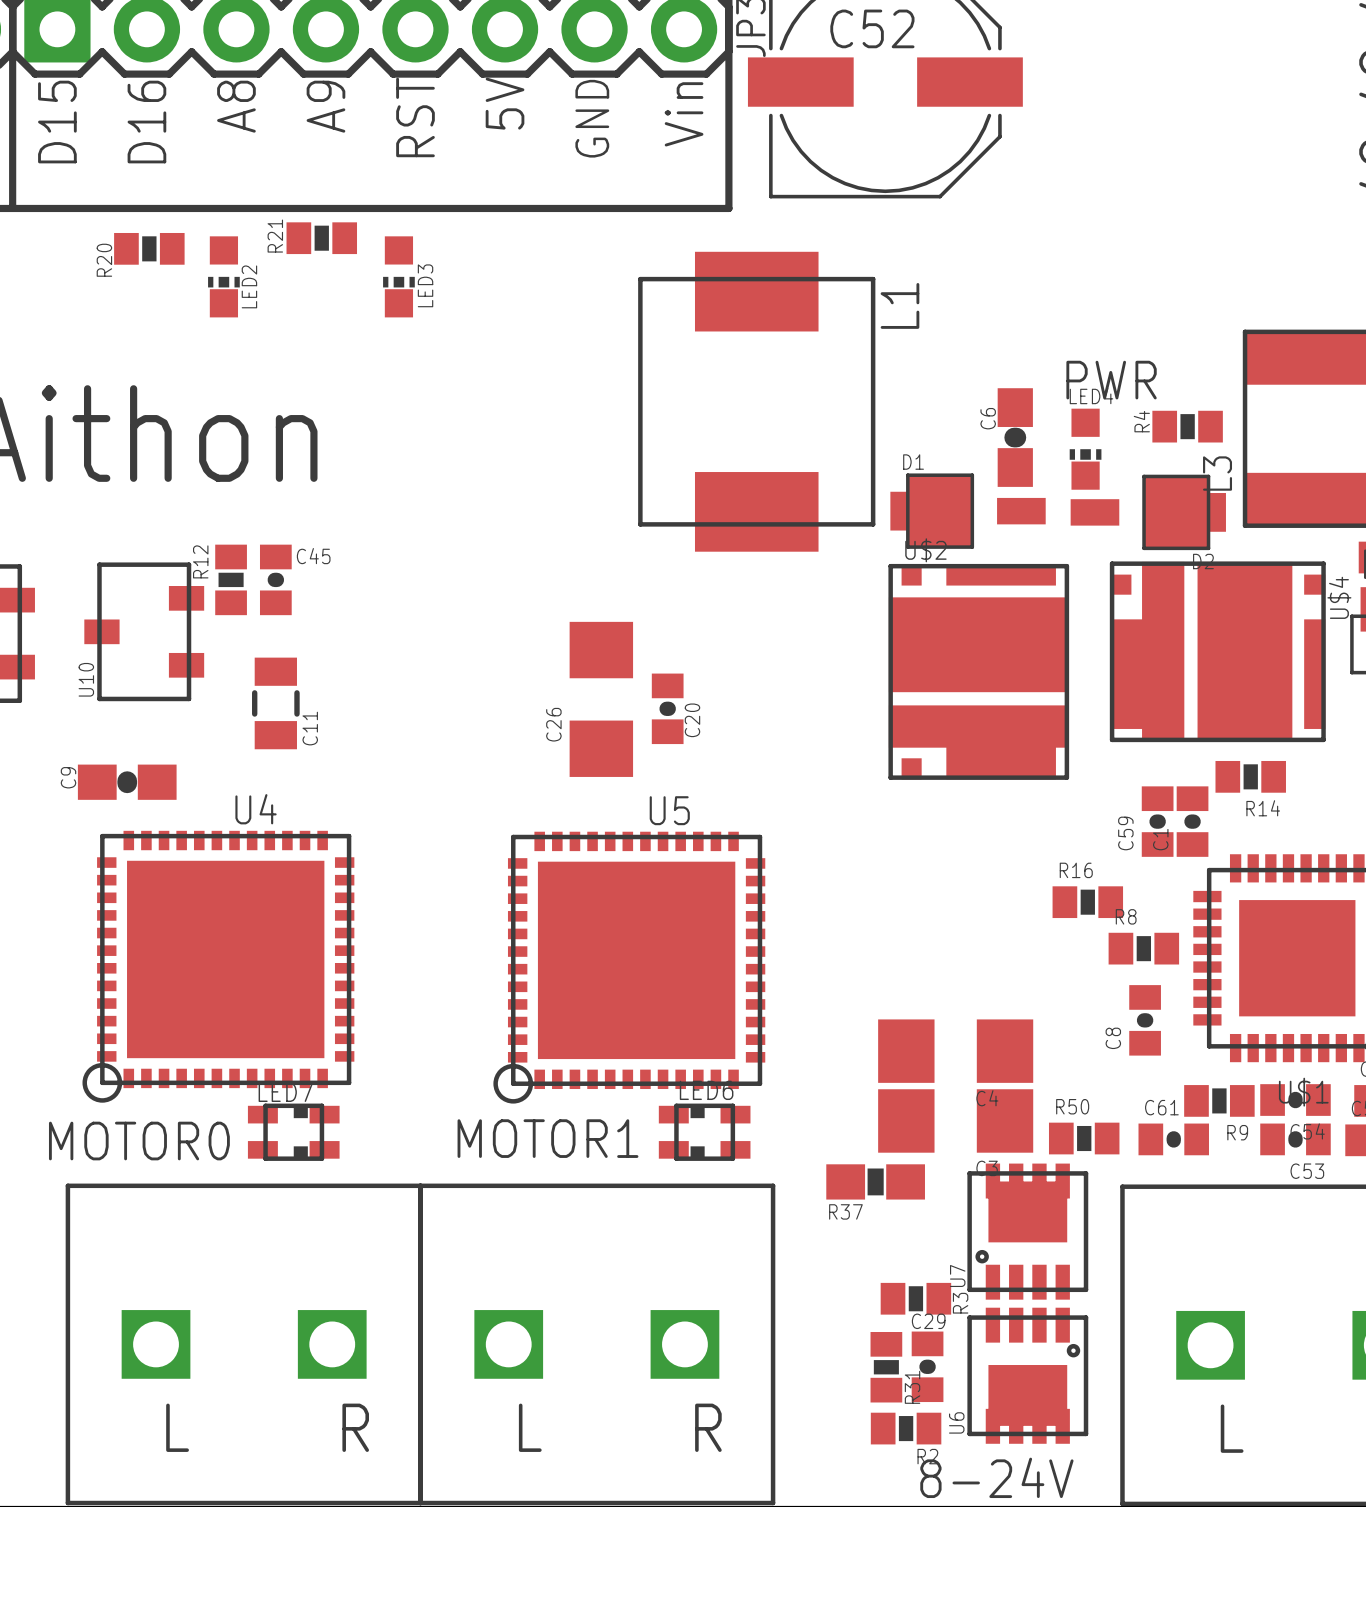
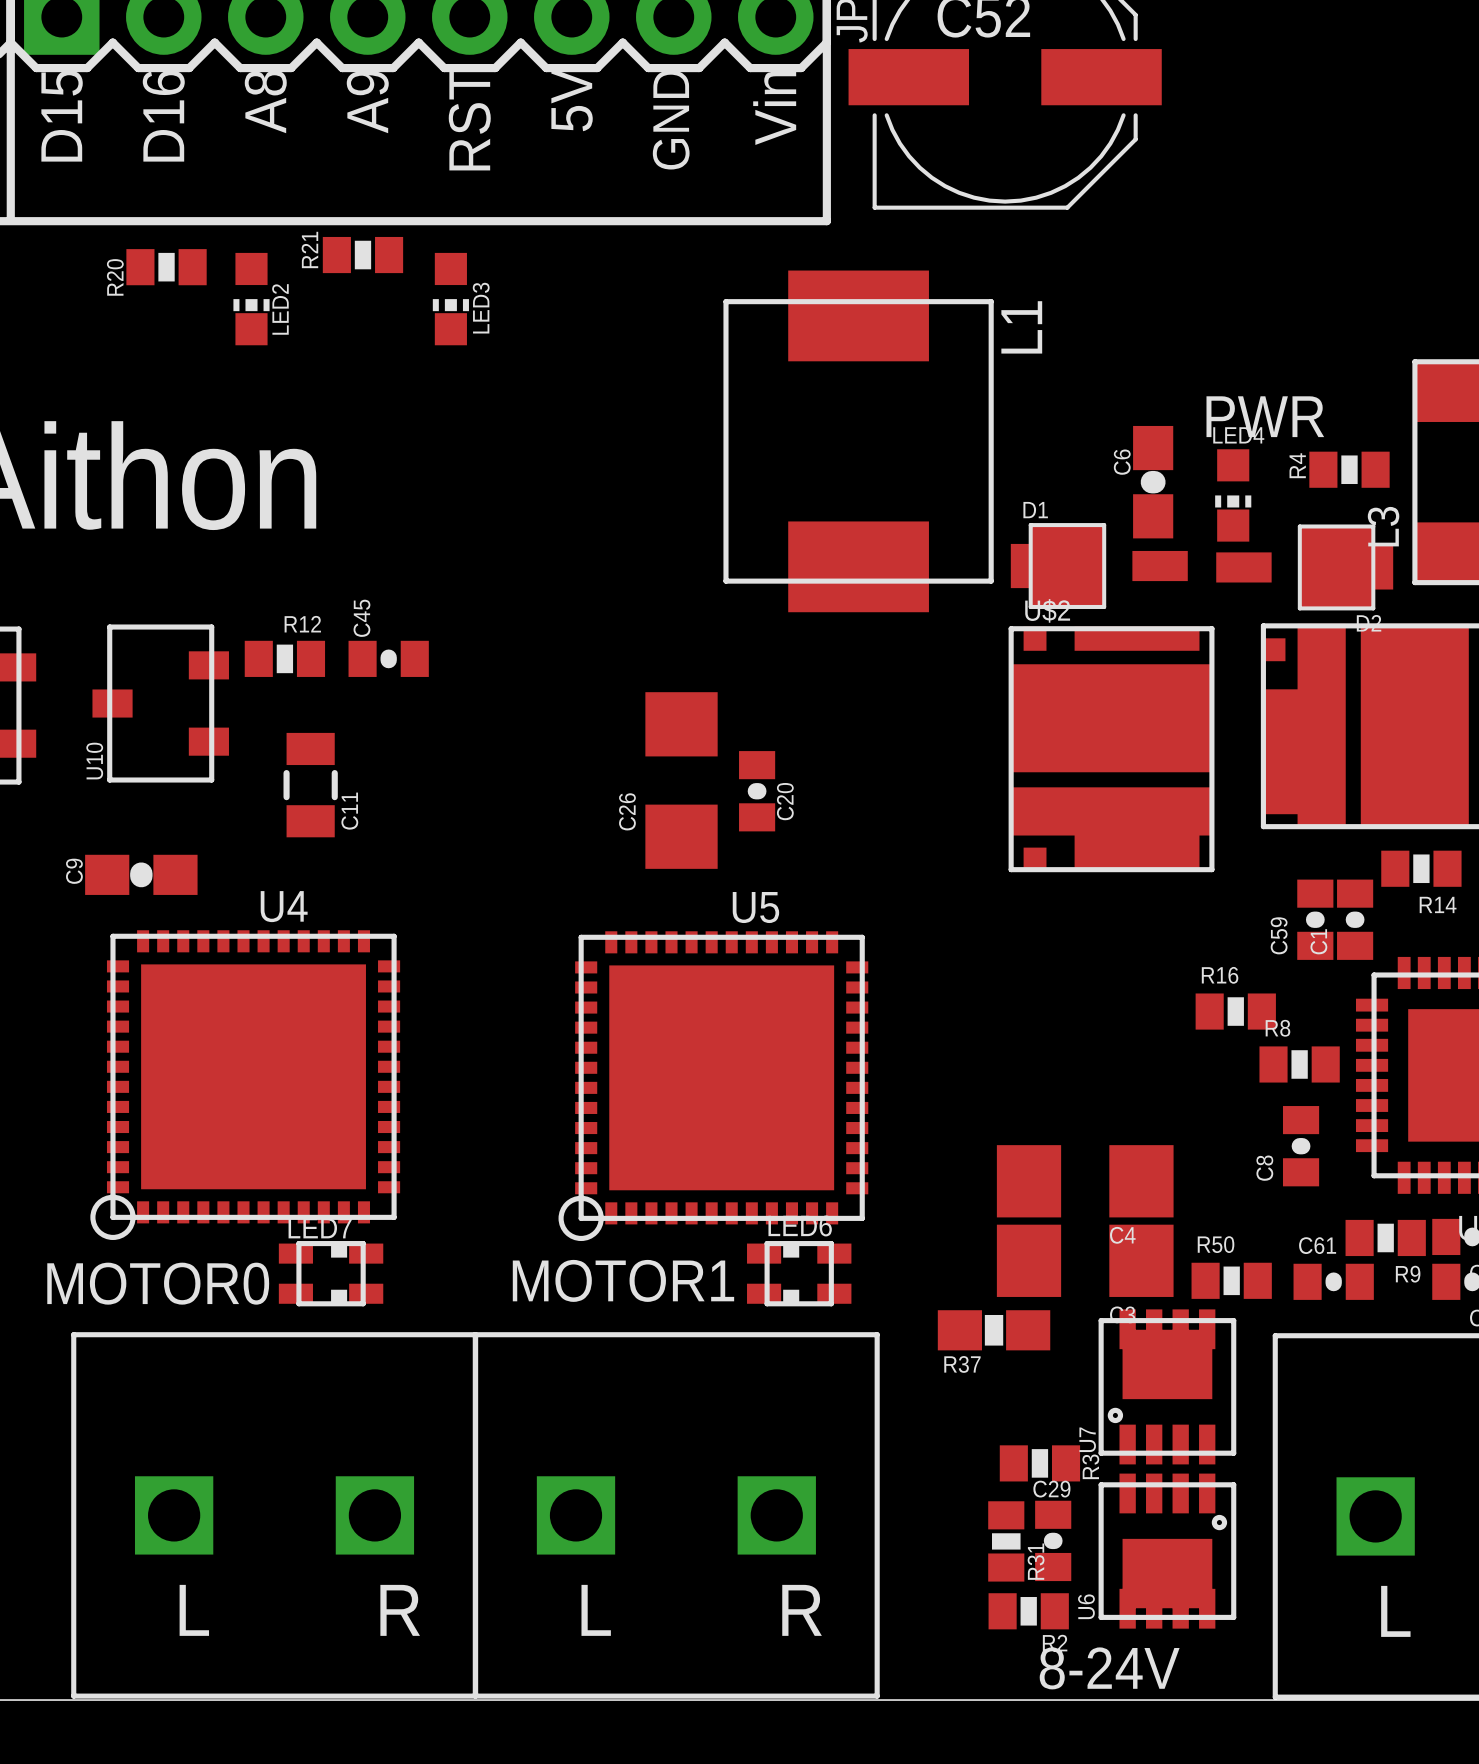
R12 rotation: 0° (231, 579) -> 90° clockwise (284, 658)
C45 rotation: 0° (275, 579) -> 90° clockwise (388, 658)
C45 position: (275, 579) -> (388, 658)

